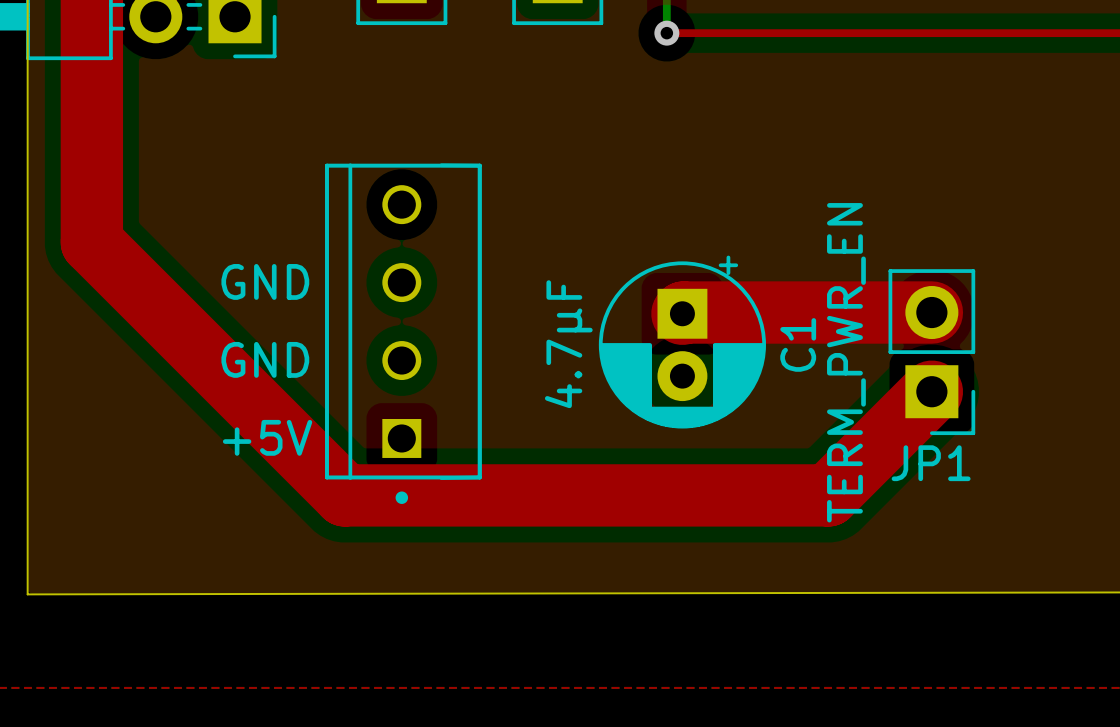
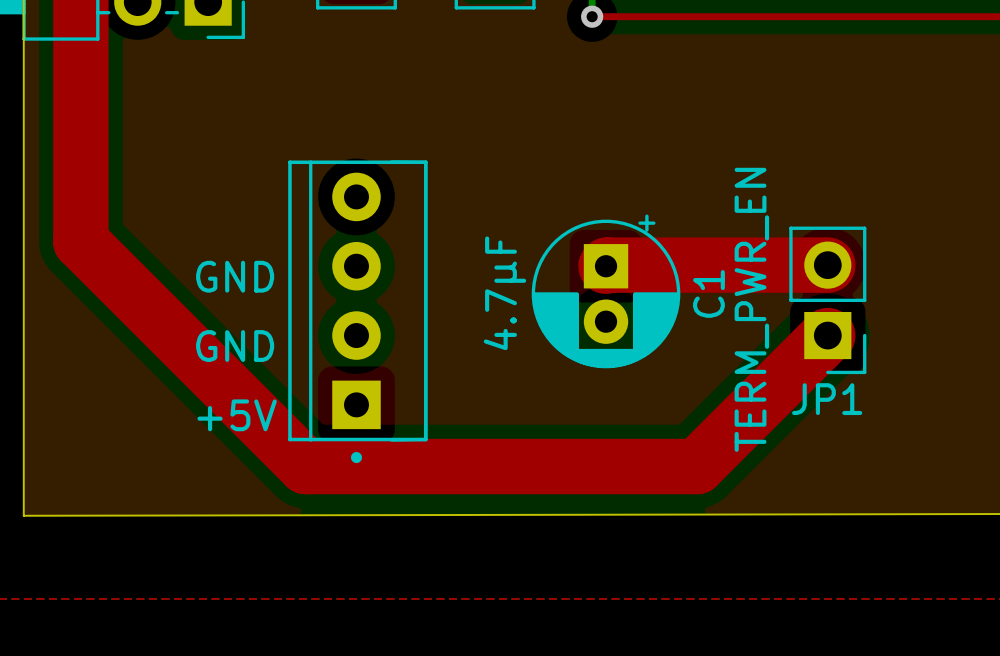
part footprint: [325, 163, 482, 504] -> [288, 160, 428, 464]
top track: (91, 242) (344, 495) (828, 495) -> (80, 202) (80, 241) (305, 466) (696, 466) (735, 427)
text: GND (265, 281) -> none
text: none -> GND (235, 276)
text: GND (265, 359) -> none
text: none -> GND (235, 346)
text position: +5V (267, 437) -> +5V (237, 415)

